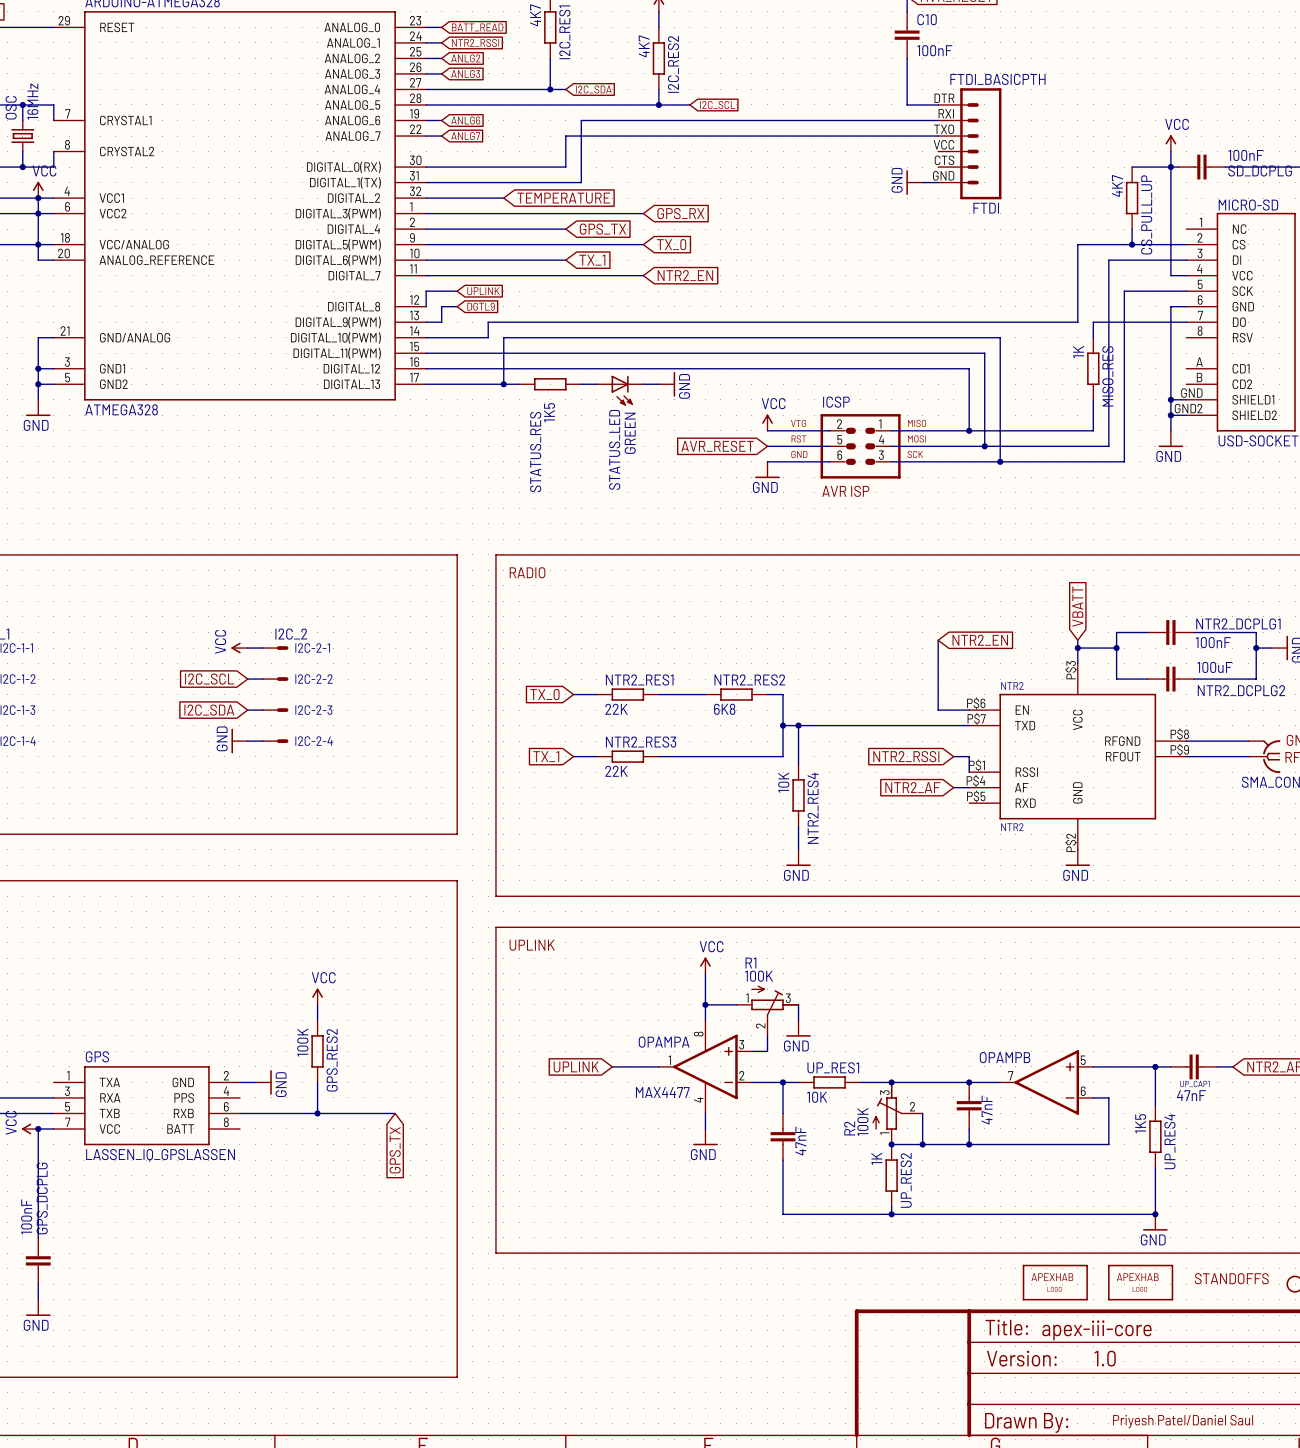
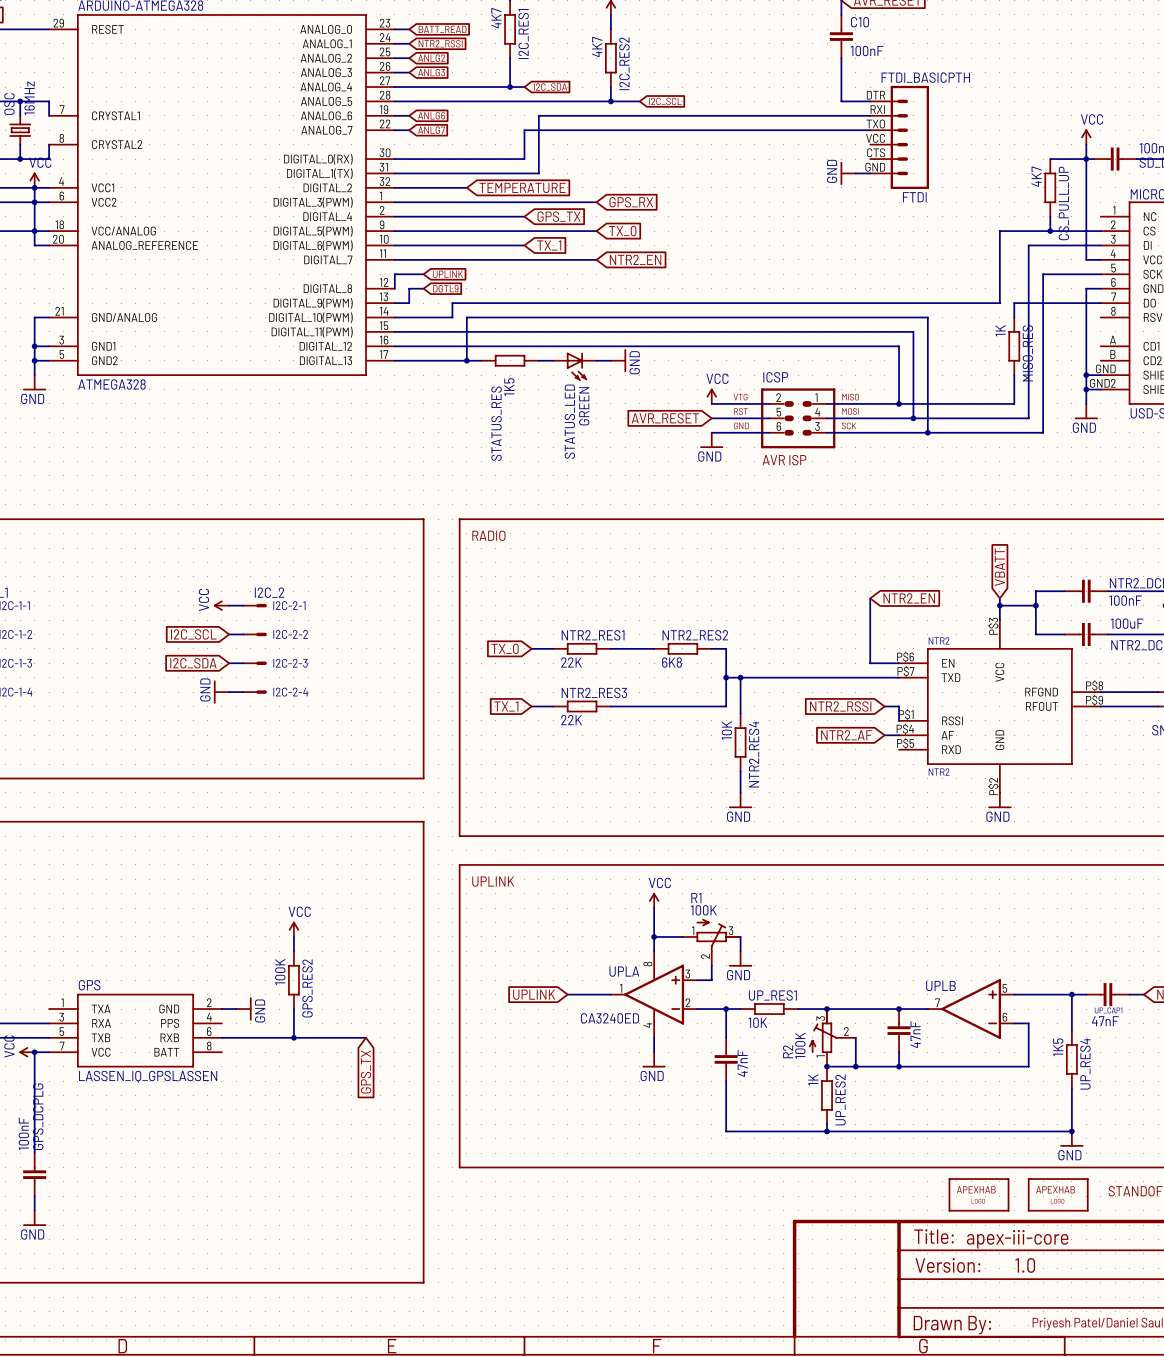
OPAMPA name: OPAMPA (664, 1042) -> UPLA (624, 971)
OPAMPB name: OPAMPB (1005, 1057) -> UPLB (940, 986)
OPAMPA value: MAX4477 (662, 1092) -> CA3240ED (609, 1018)

